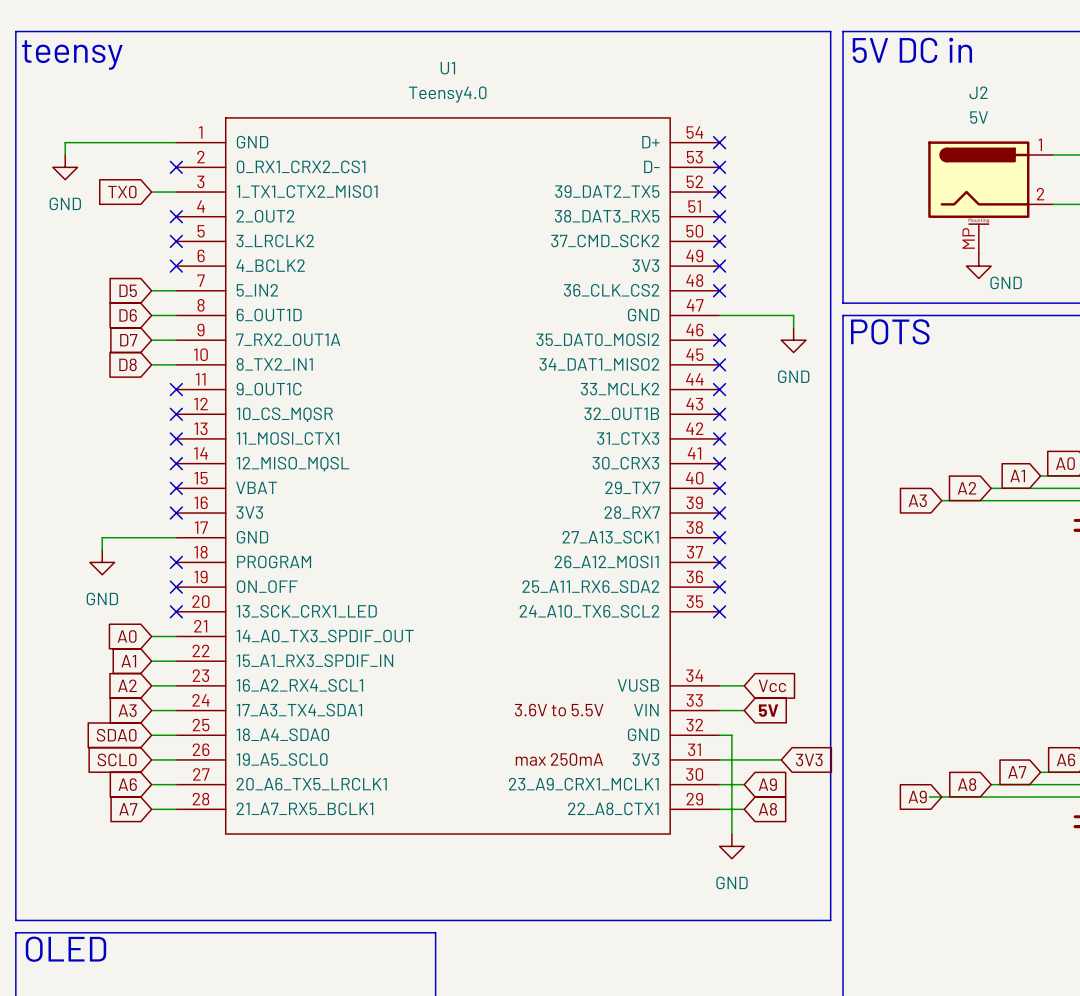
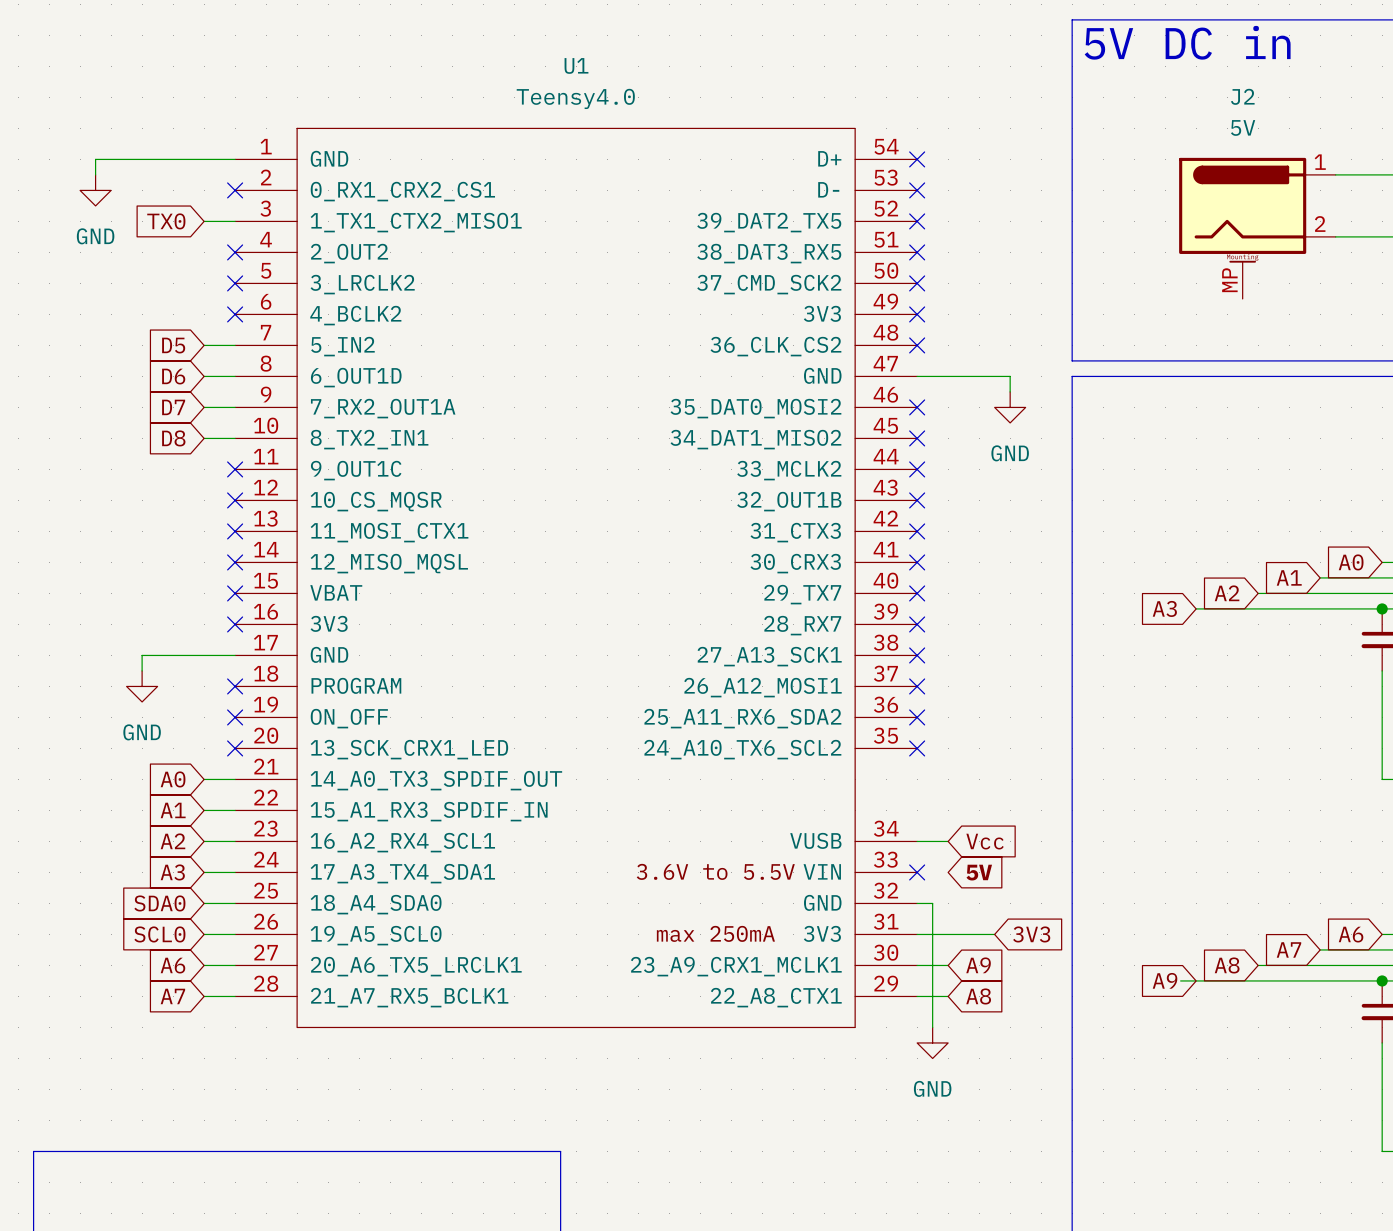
line: (15, 31) (15, 920) (830, 920) (830, 31) (15, 31) -> none
text: teensy (72, 55) -> none
power symbol: GND (978, 266) -> none
text: POTS (890, 331) -> none
wire: (719, 710) (744, 710) -> none
no-connect mark: none -> (917, 872)
text: OLED (65, 949) -> none

